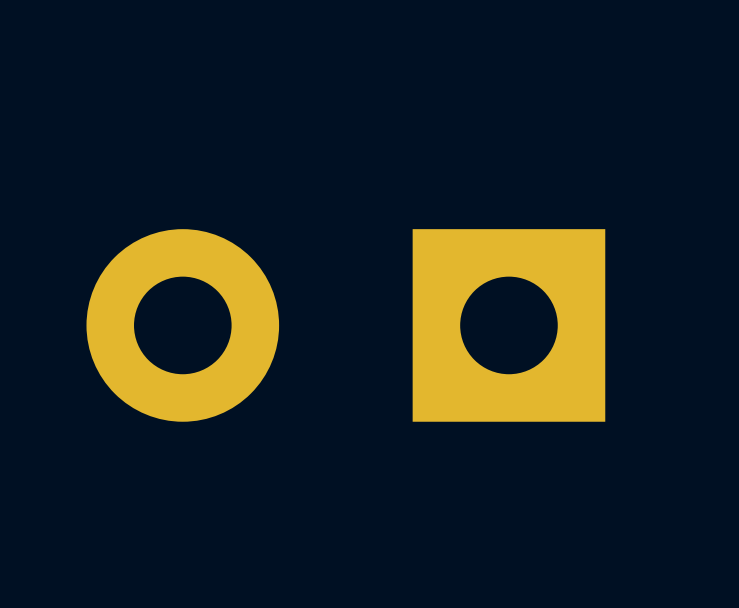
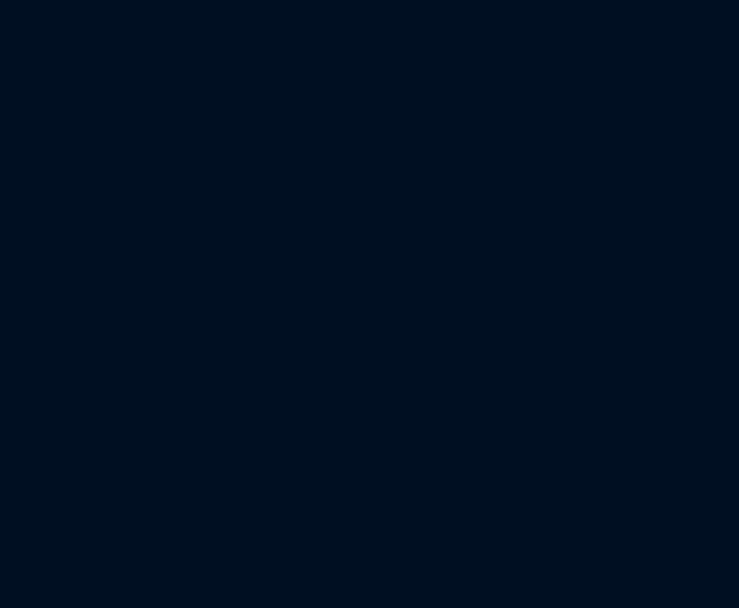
part: (345, 325) -> none

